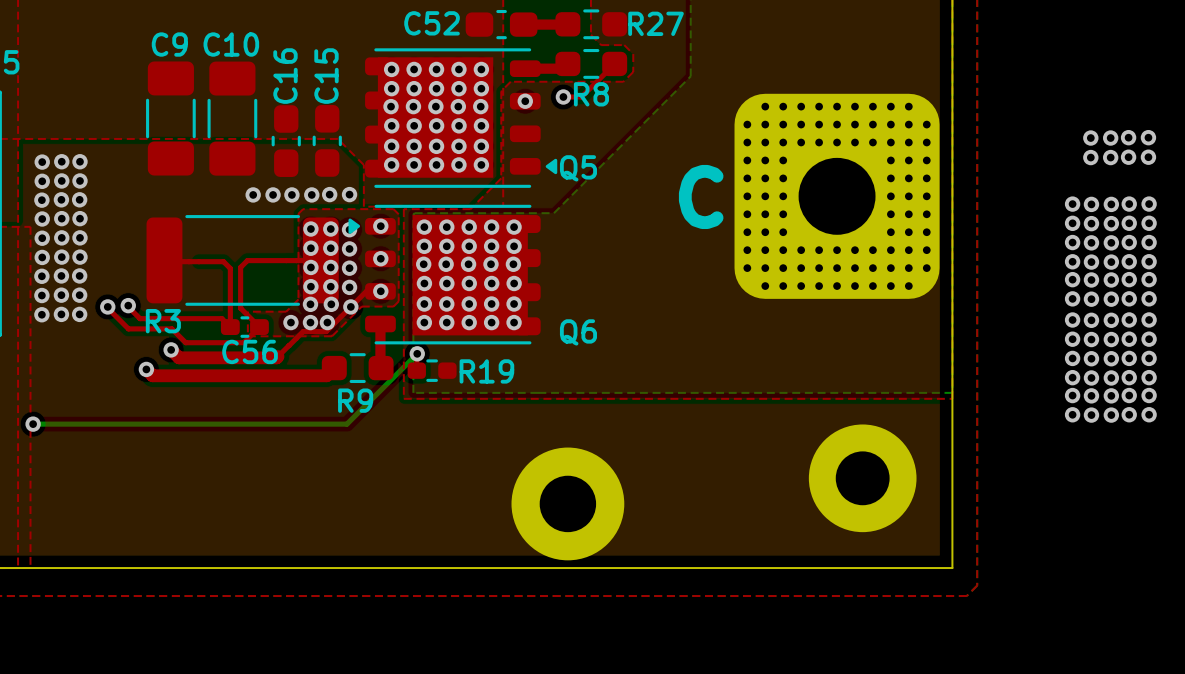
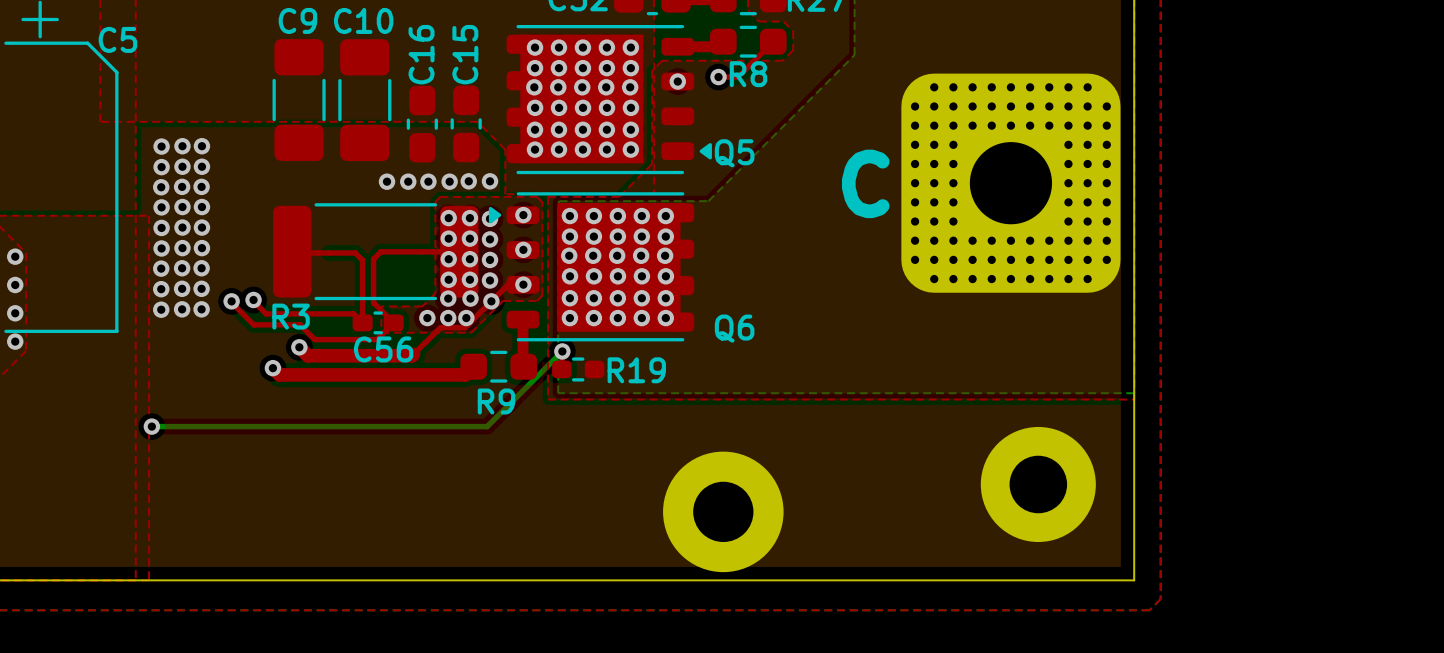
via: (1128, 137) -> none
via: (1148, 137) -> none
via: (1090, 138) -> none
via: (1110, 138) -> none
via: (1090, 157) -> none
via: (1110, 157) -> none
via: (1128, 157) -> none
via: (1148, 157) -> none
via: (1072, 204) -> none
via: (1091, 204) -> none
via: (1111, 204) -> none
via: (1129, 204) -> none
via: (1149, 204) -> none
via: (1072, 223) -> none
via: (1091, 223) -> none
via: (1111, 223) -> none
via: (1129, 223) -> none
via: (1149, 223) -> none
via: (1072, 242) -> none
via: (1091, 242) -> none
via: (1111, 242) -> none
via: (1129, 242) -> none
via: (1149, 242) -> none
via: (1072, 261) -> none
via: (1129, 261) -> none
via: (1149, 261) -> none
via: (1091, 262) -> none
via: (1111, 262) -> none
via: (1072, 279) -> none
via: (1091, 279) -> none
via: (1111, 279) -> none
via: (1129, 279) -> none
via: (1149, 279) -> none
via: (1072, 298) -> none
via: (1129, 298) -> none
via: (1149, 298) -> none
via: (1091, 299) -> none
via: (1111, 299) -> none
via: (1072, 319) -> none
via: (1129, 319) -> none
via: (1149, 319) -> none
via: (1091, 320) -> none
via: (1111, 320) -> none
via: (1072, 339) -> none
via: (1091, 339) -> none
via: (1111, 339) -> none
via: (1129, 339) -> none
via: (1149, 339) -> none
via: (1072, 358) -> none
via: (1091, 358) -> none
via: (1111, 358) -> none
via: (1129, 358) -> none
via: (1149, 358) -> none
via: (1072, 377) -> none
via: (1091, 377) -> none
via: (1111, 377) -> none
via: (1129, 377) -> none
via: (1149, 377) -> none
via: (1072, 395) -> none
via: (1091, 395) -> none
via: (1111, 395) -> none
via: (1129, 395) -> none
via: (1149, 395) -> none
via: (1072, 414) -> none
via: (1129, 414) -> none
via: (1149, 414) -> none
via: (1091, 415) -> none
via: (1111, 415) -> none

